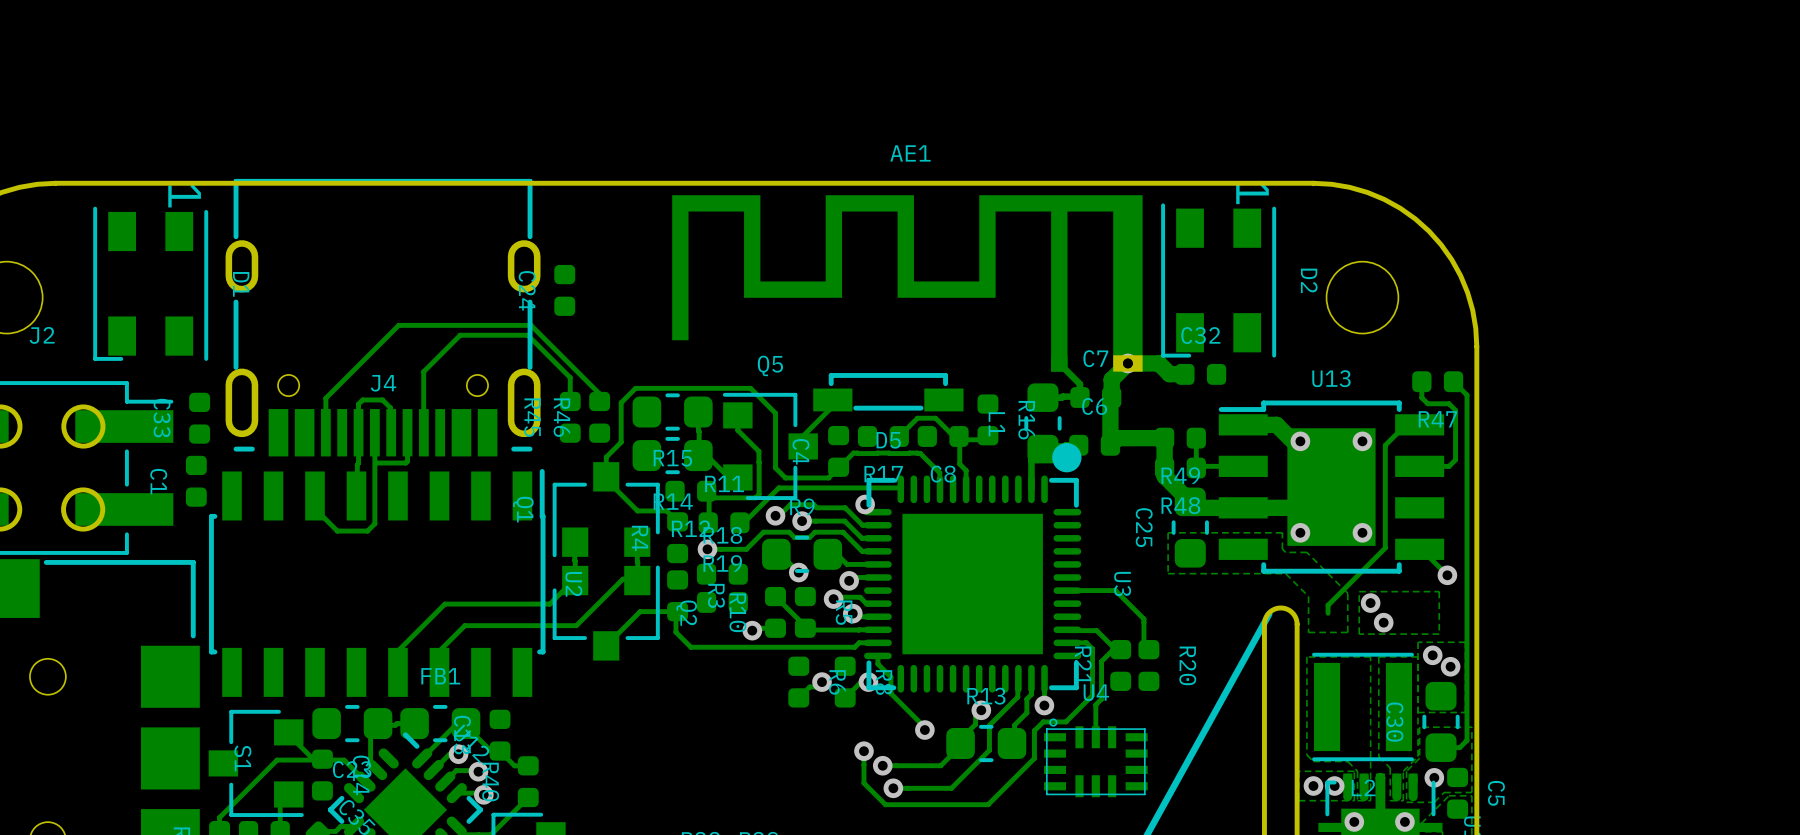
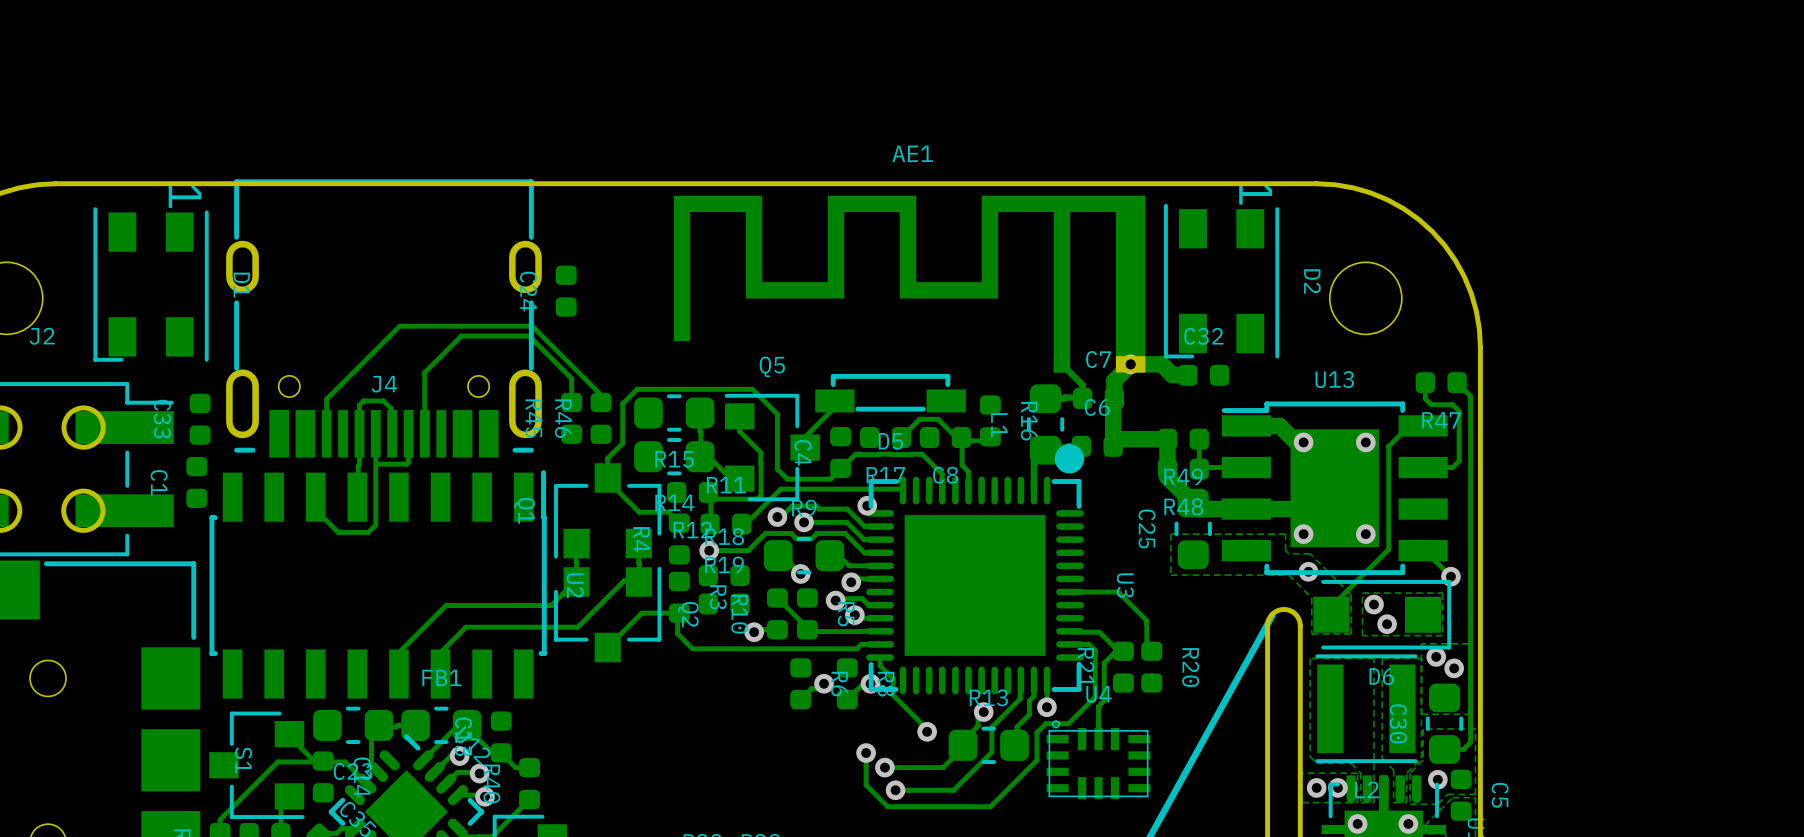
via: none -> (1308, 571)
D6: none -> (1382, 614)

